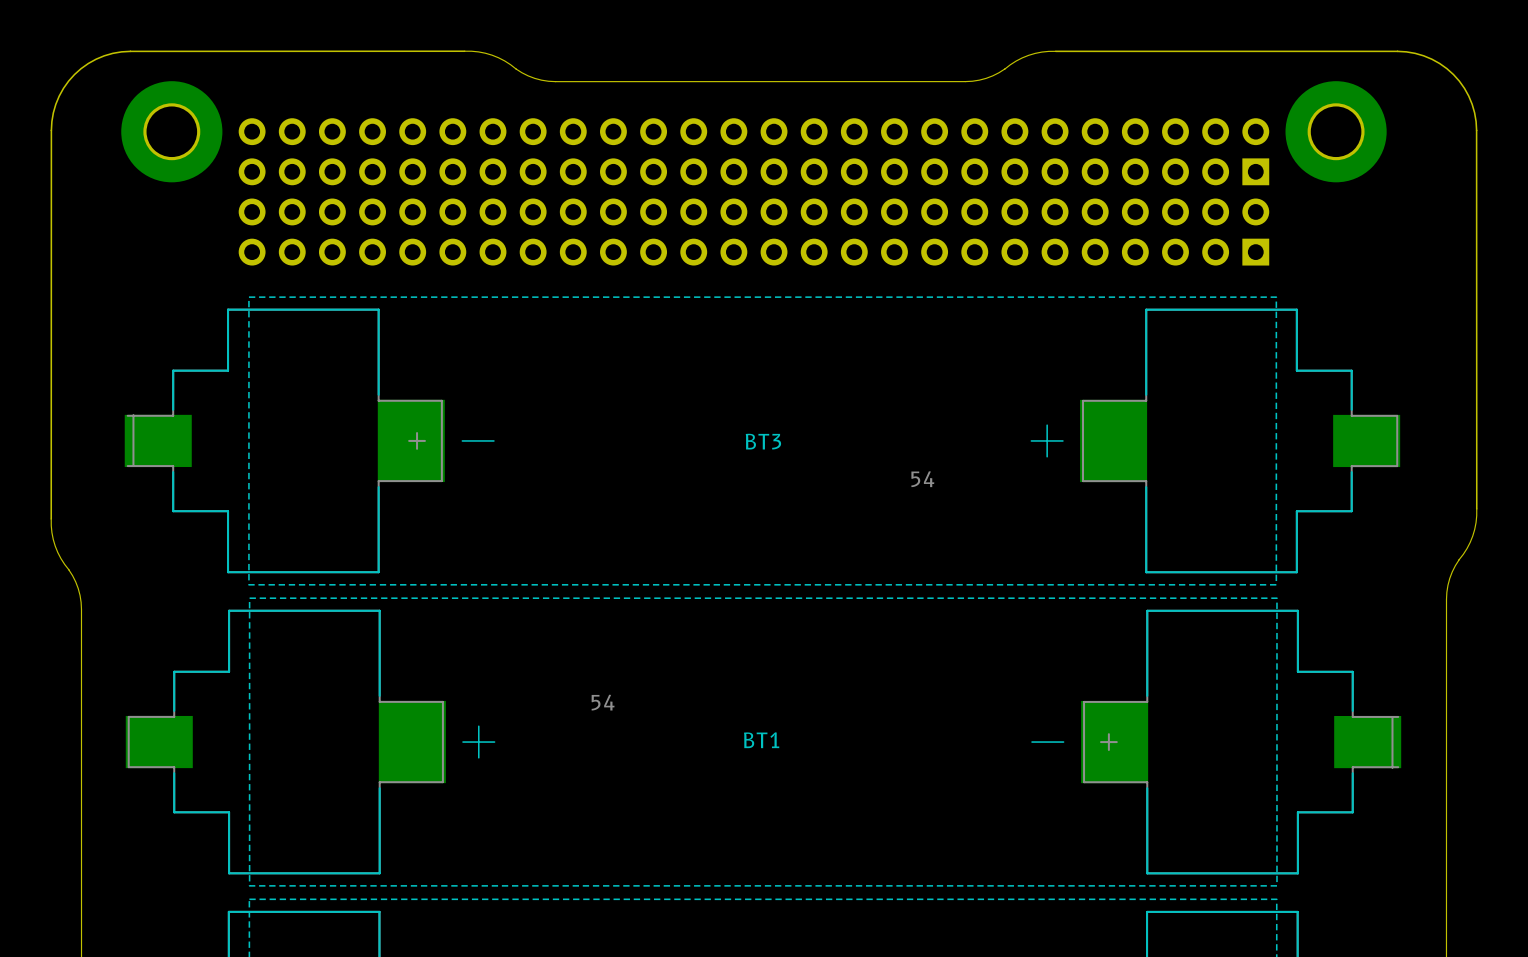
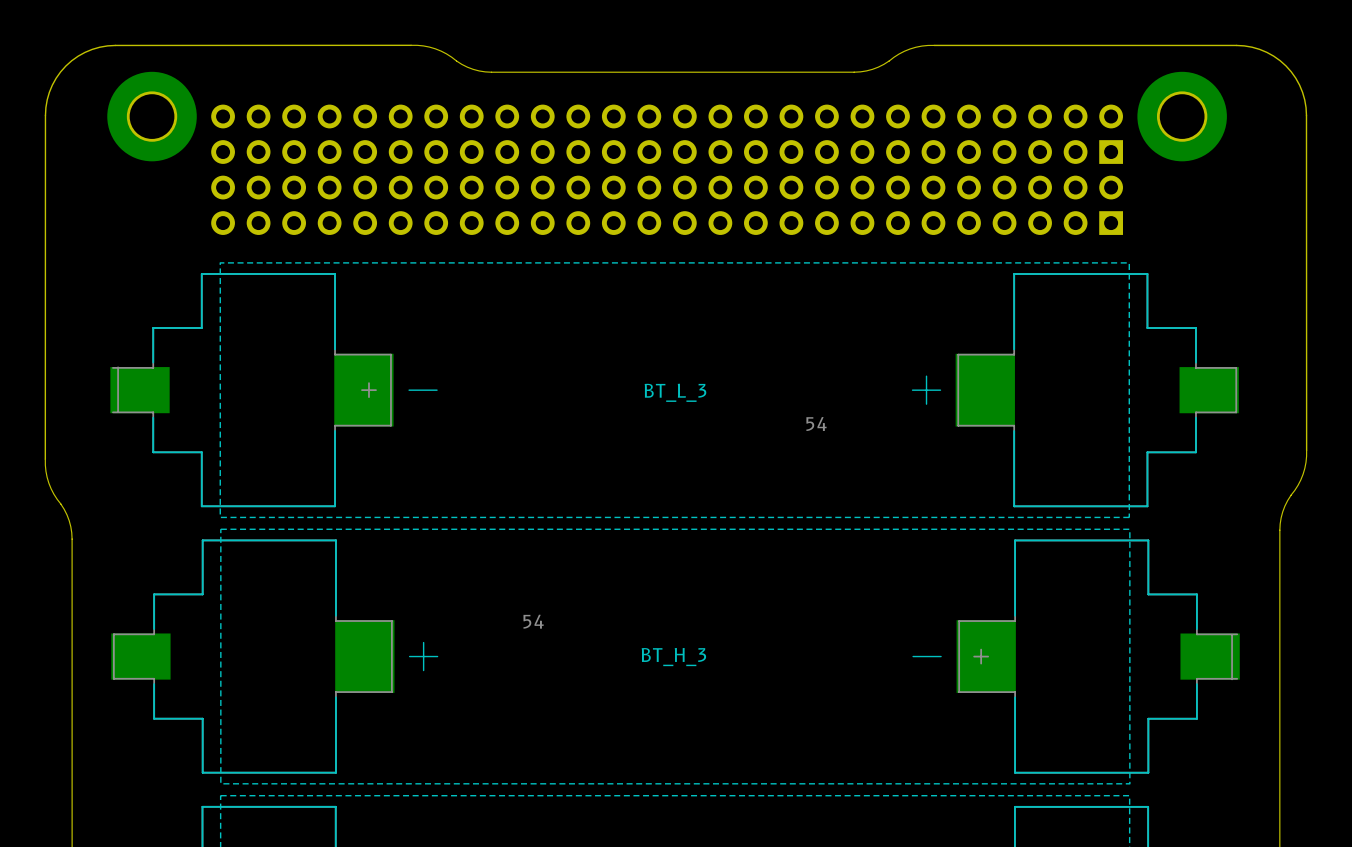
BT3 name: BT3 (763, 441) -> BT_L_3 (675, 392)
BT1 name: BT1 (761, 740) -> BT_H_3 (673, 657)

